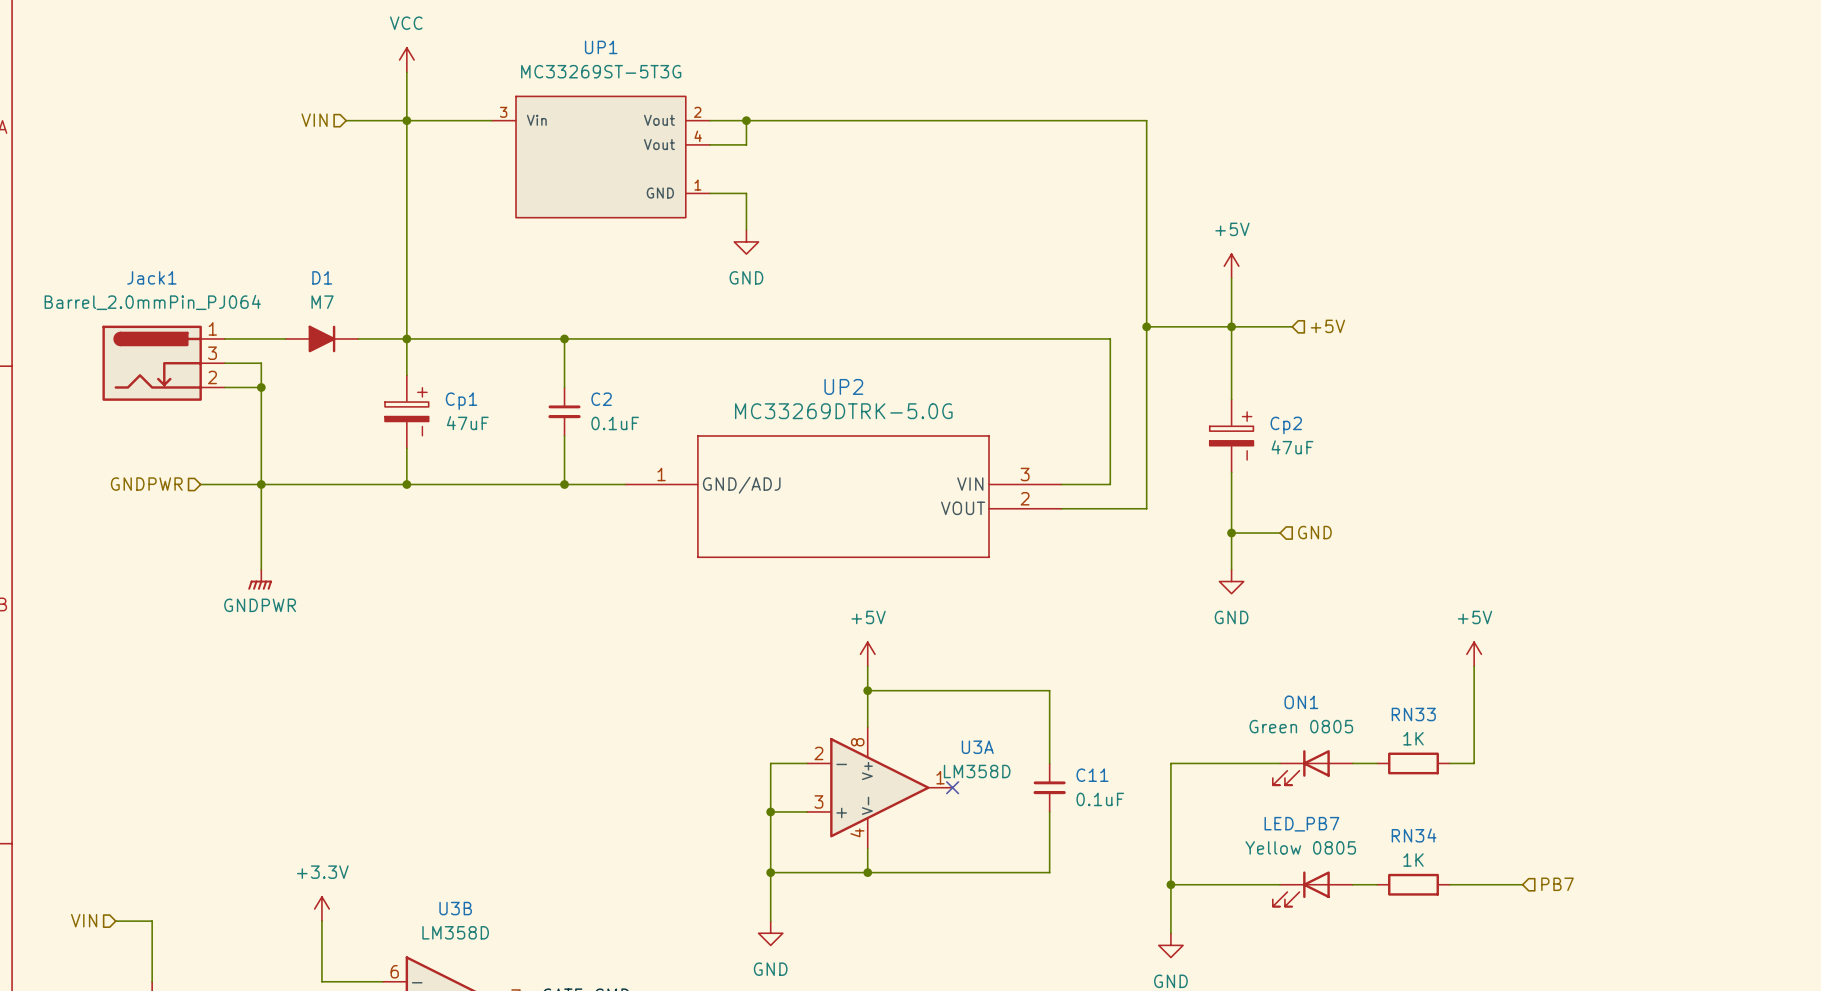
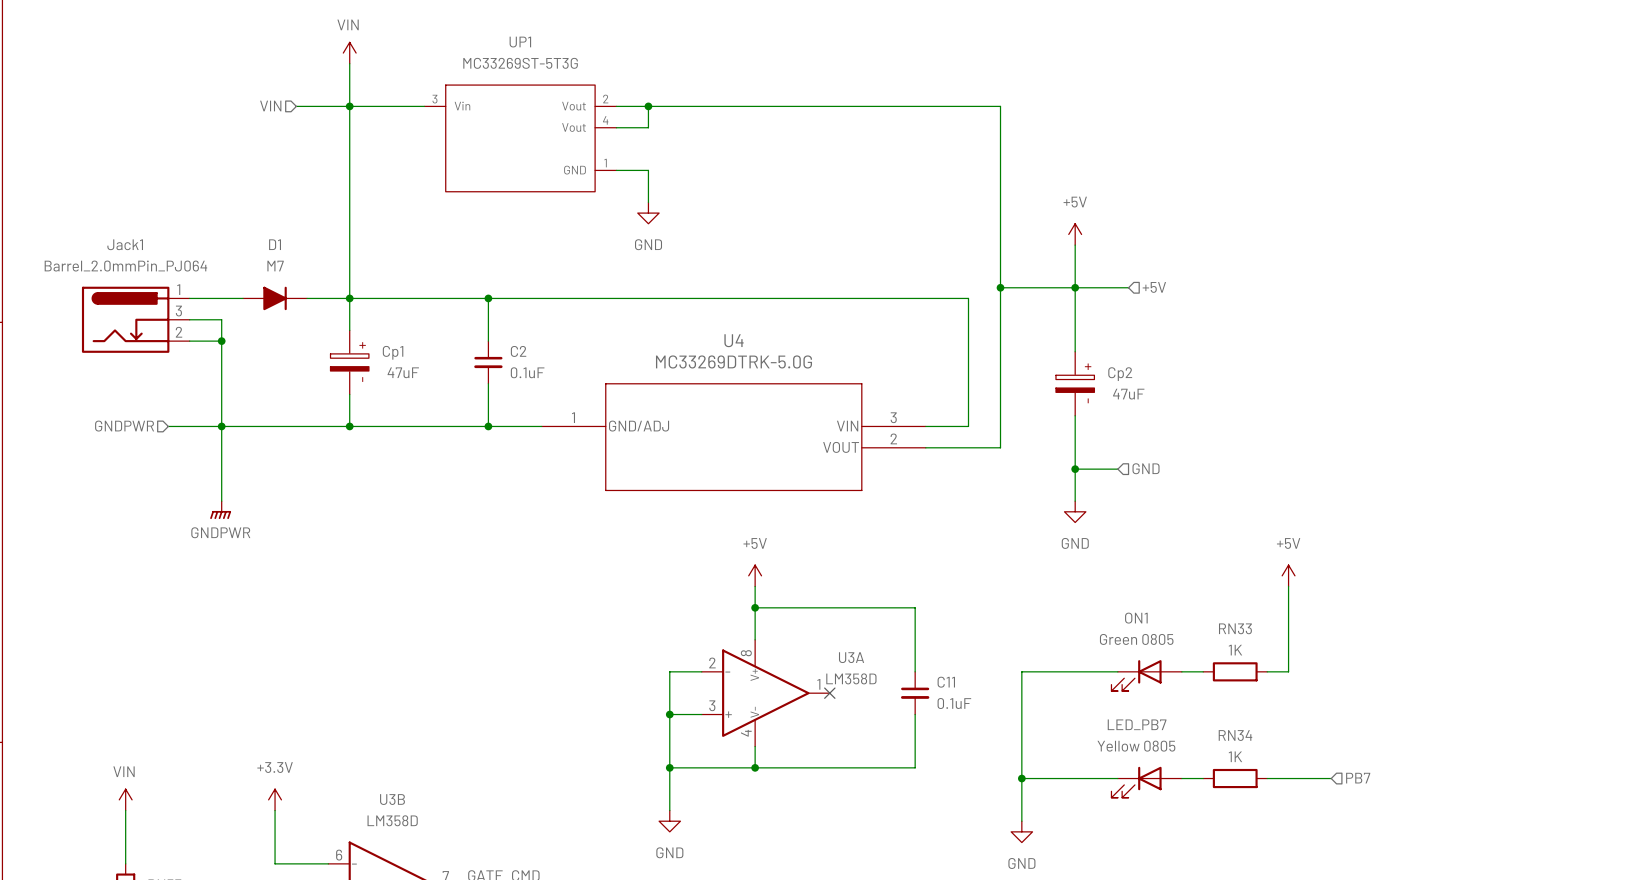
power symbol: VCC (406, 60) -> VIN (349, 53)
UP2 name: UP2 (843, 386) -> U4 (734, 340)
power symbol: none -> VIN (125, 799)
hierarchical label: VIN (84, 920) -> none
wire: (115, 921) (152, 921) -> none

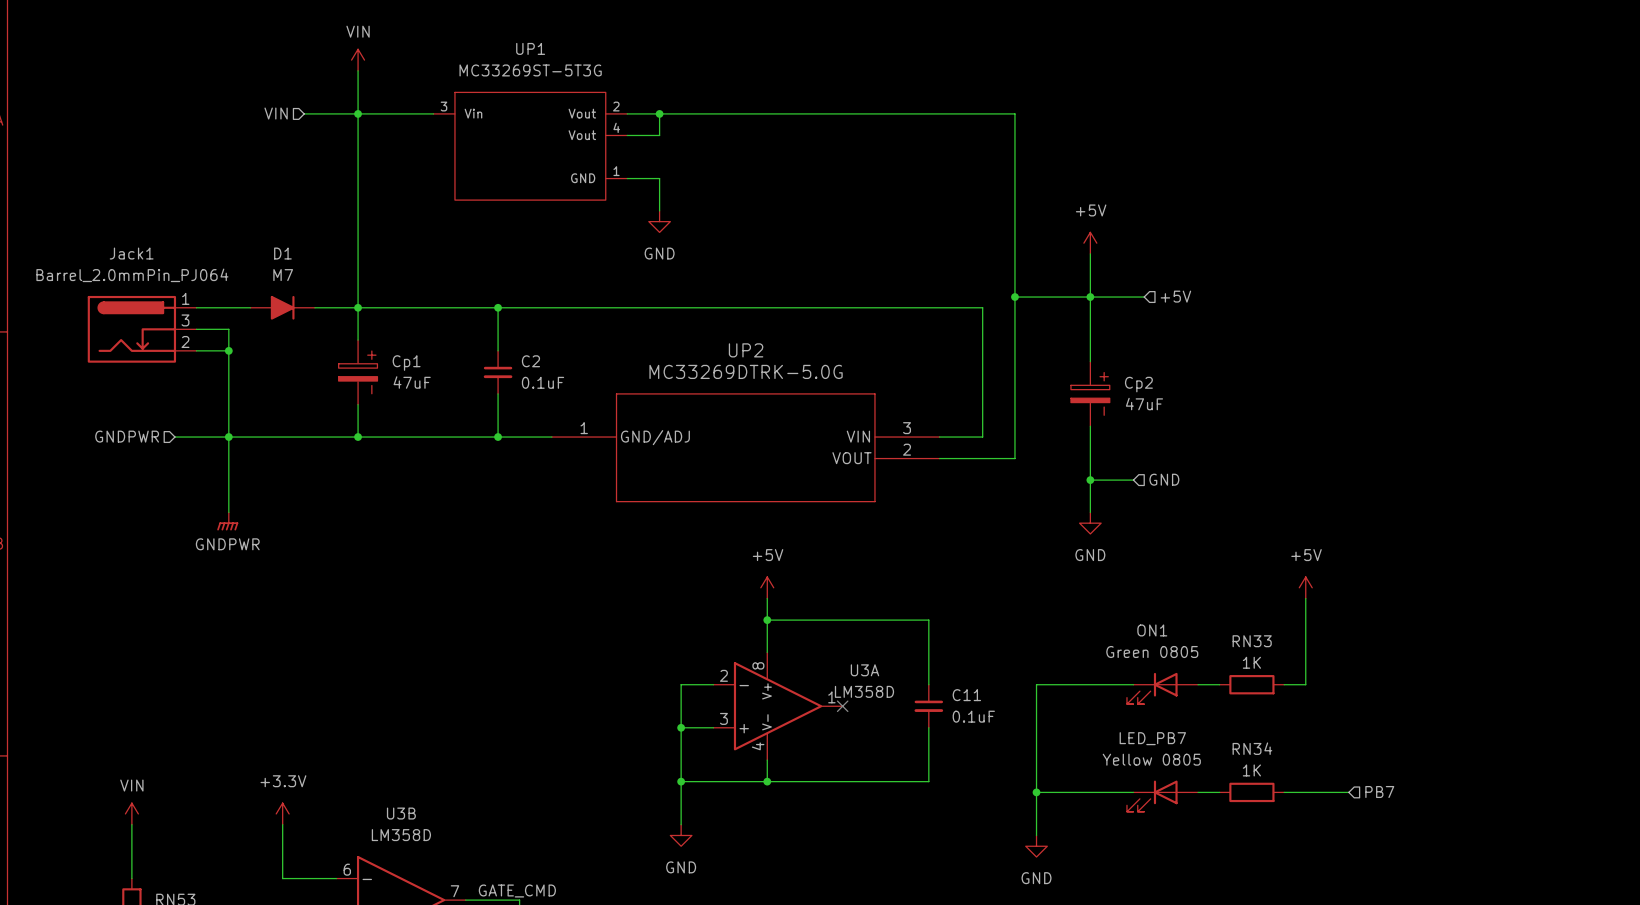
U4 name: U4 (734, 340) -> UP2 (746, 350)

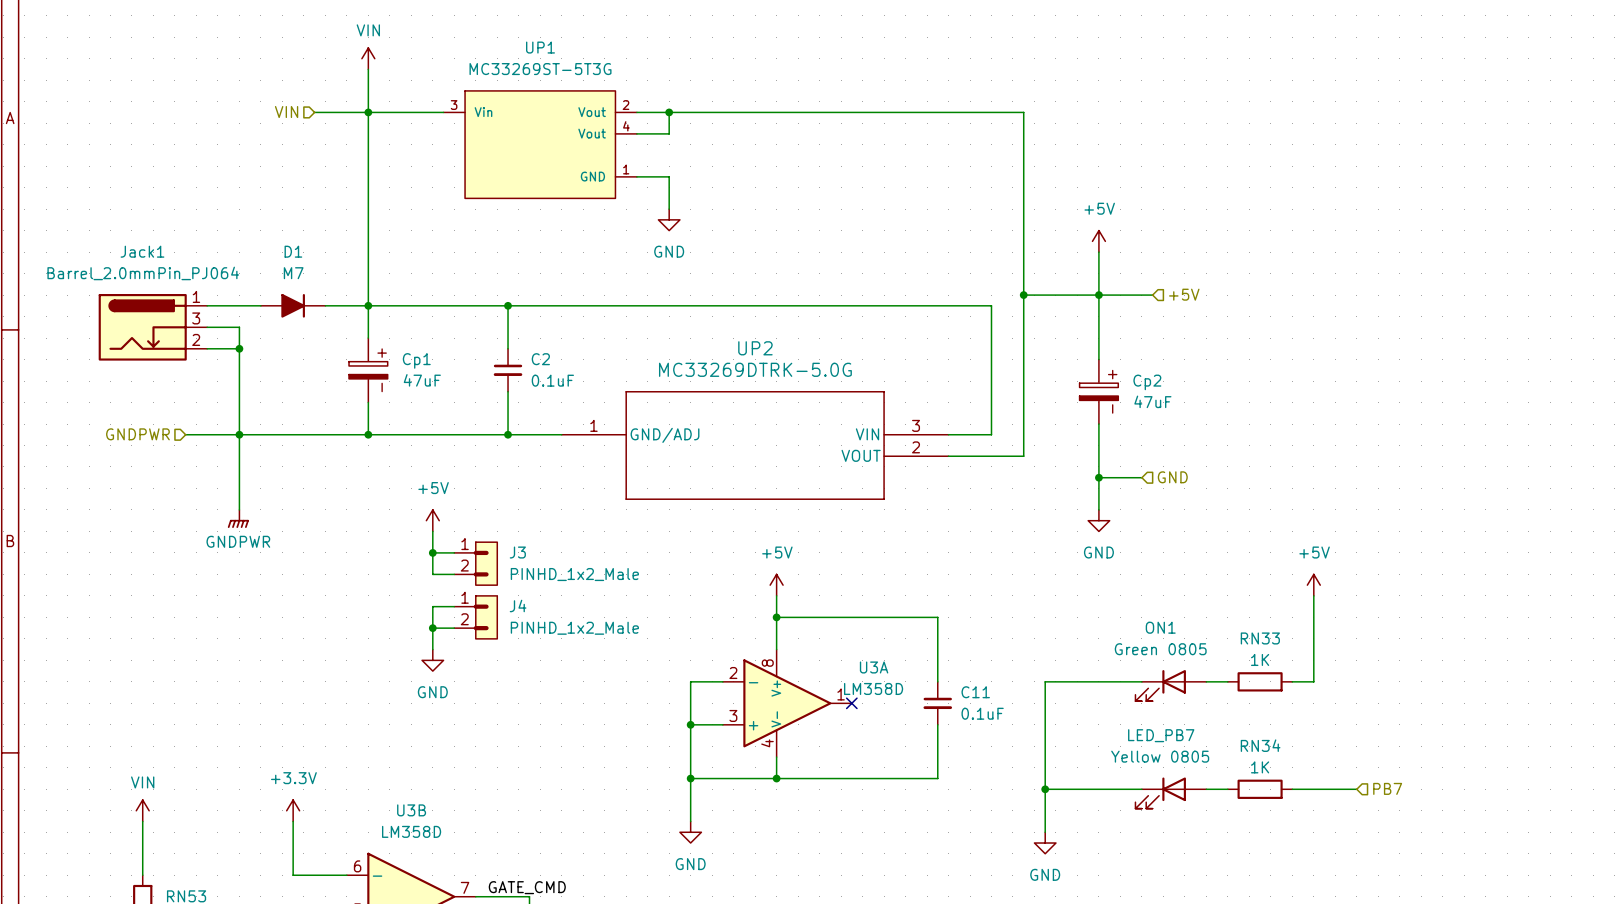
power symbol: none -> +5V (432, 520)
wire: none -> (432, 531) (432, 574) (454, 574)
wire: none -> (432, 552) (454, 552)
junction: none -> (432, 552)
J3: none -> PINHD_1x2_Male (475, 563)
wire: none -> (454, 606) (432, 606) (432, 649)
J4: none -> PINHD_1x2_Male (475, 617)
wire: none -> (432, 628) (454, 628)
junction: none -> (432, 628)
power symbol: none -> GND (432, 660)

